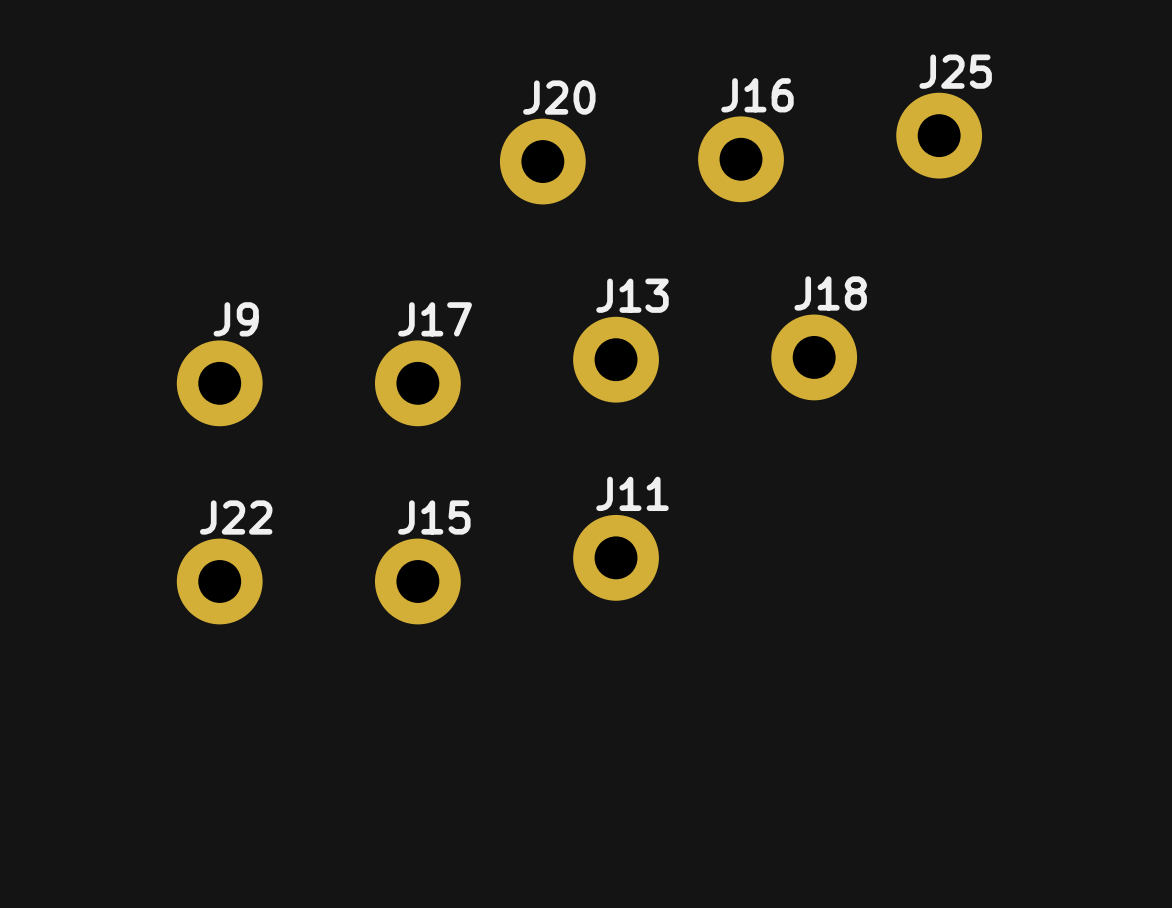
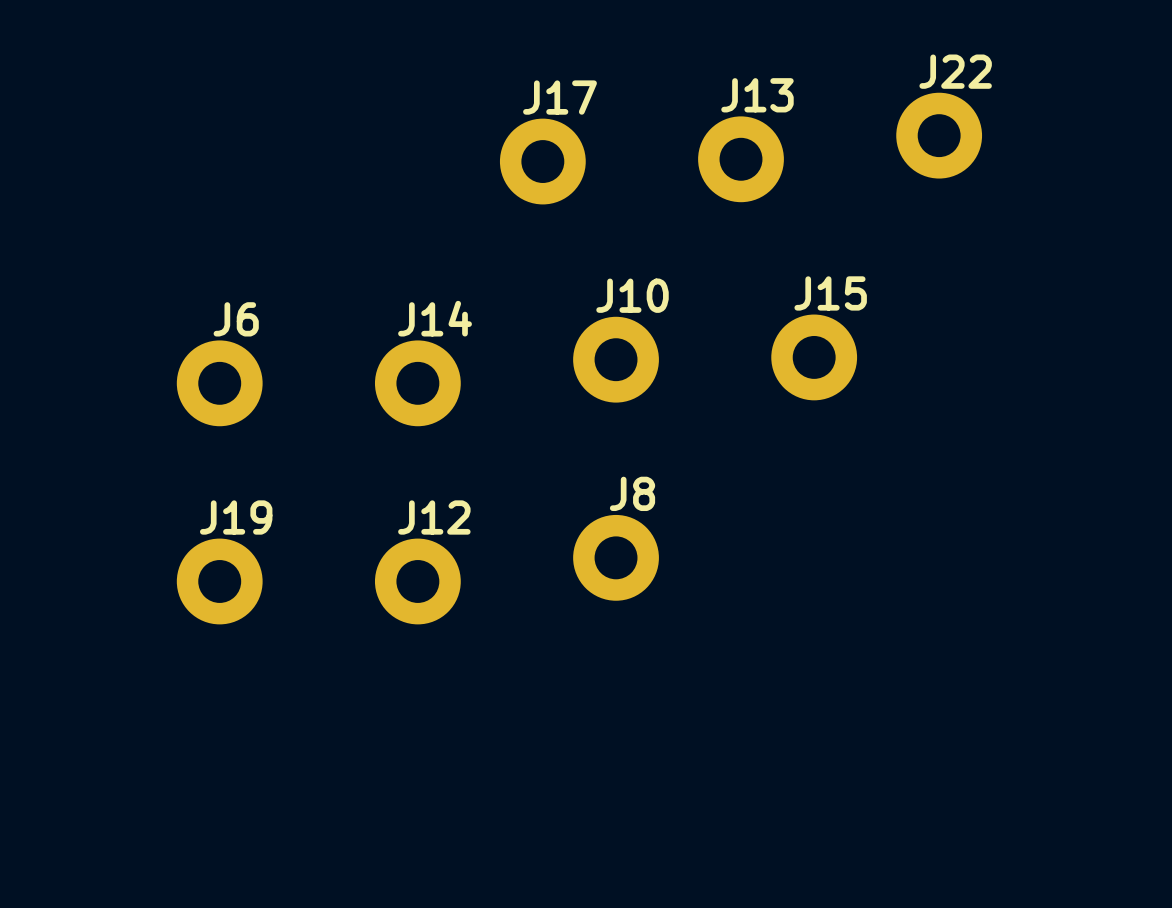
J25 name: J25 (955, 71) -> J22 (955, 71)
J16 name: J16 (757, 95) -> J13 (757, 95)
J20 name: J20 (559, 97) -> J17 (560, 97)
J18 name: J18 (830, 293) -> J15 (830, 293)
J13 name: J13 (632, 295) -> J10 (632, 295)
J9 name: J9 (236, 319) -> J6 (236, 319)
J17 name: J17 (435, 319) -> J14 (435, 318)
J11 name: J11 (632, 493) -> J8 (632, 493)
J22 name: J22 (236, 517) -> J19 (236, 517)
J15 name: J15 (434, 517) -> J12 (434, 517)

